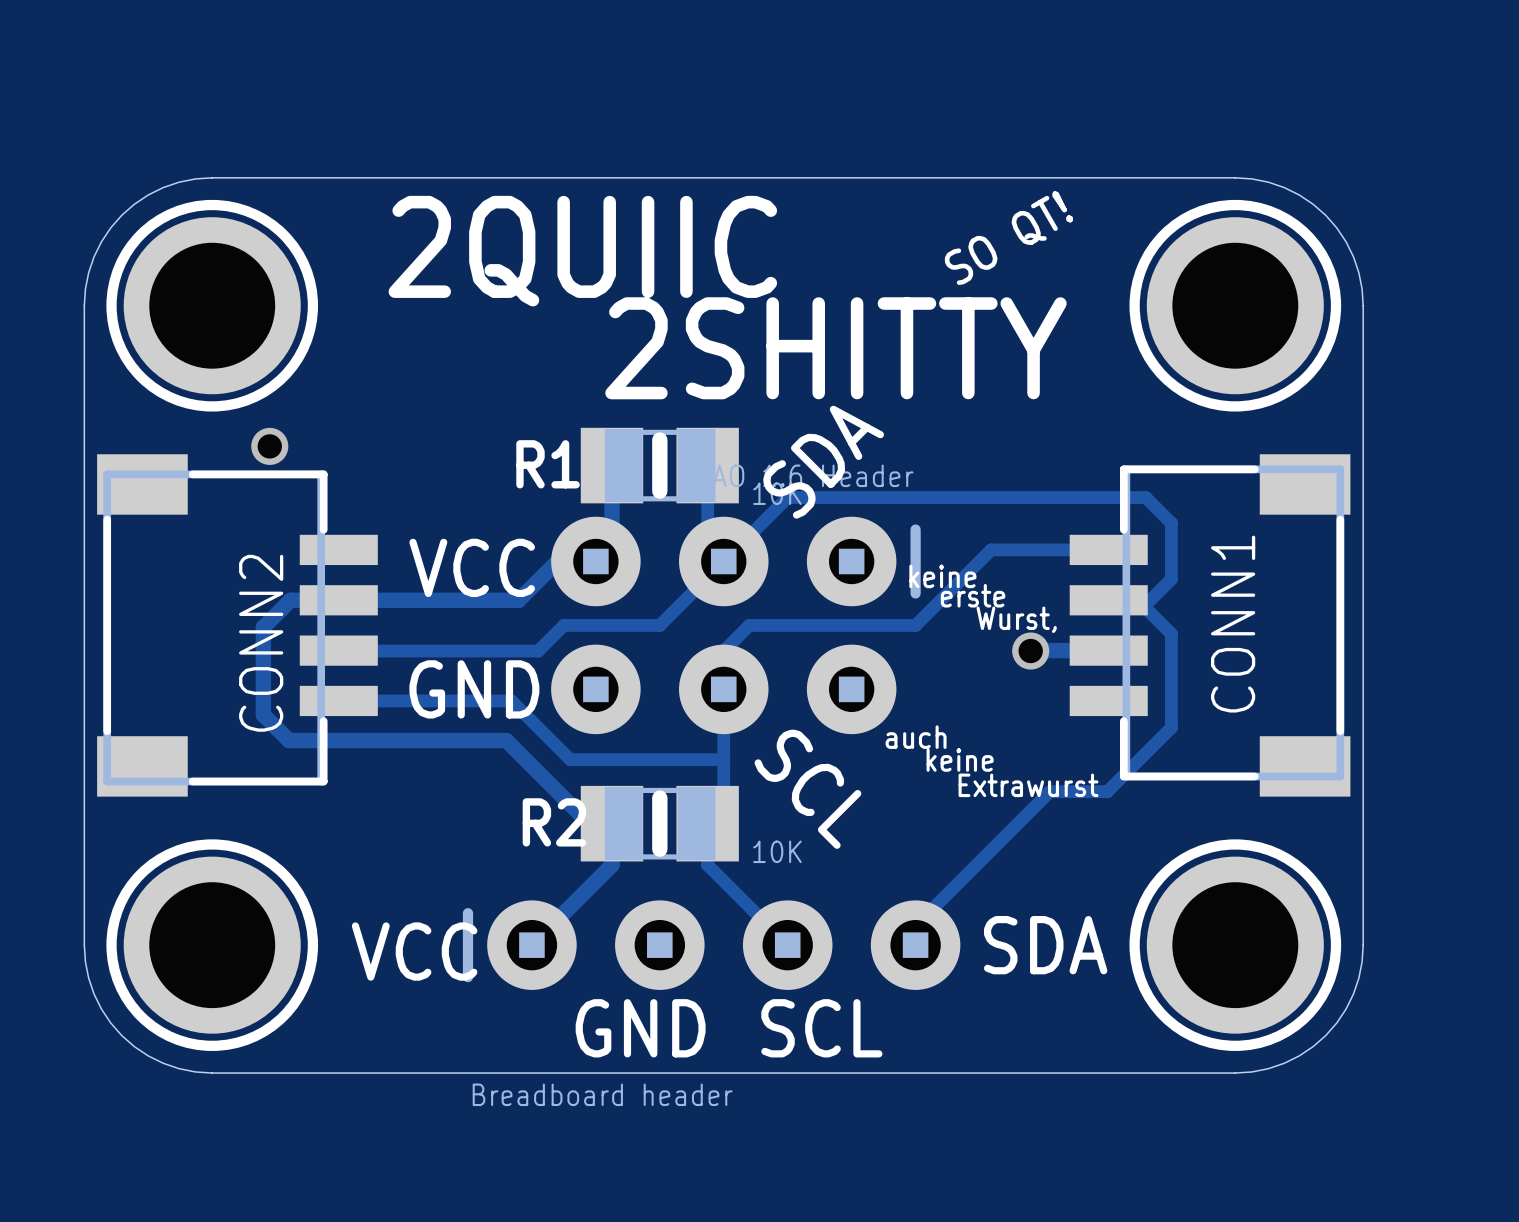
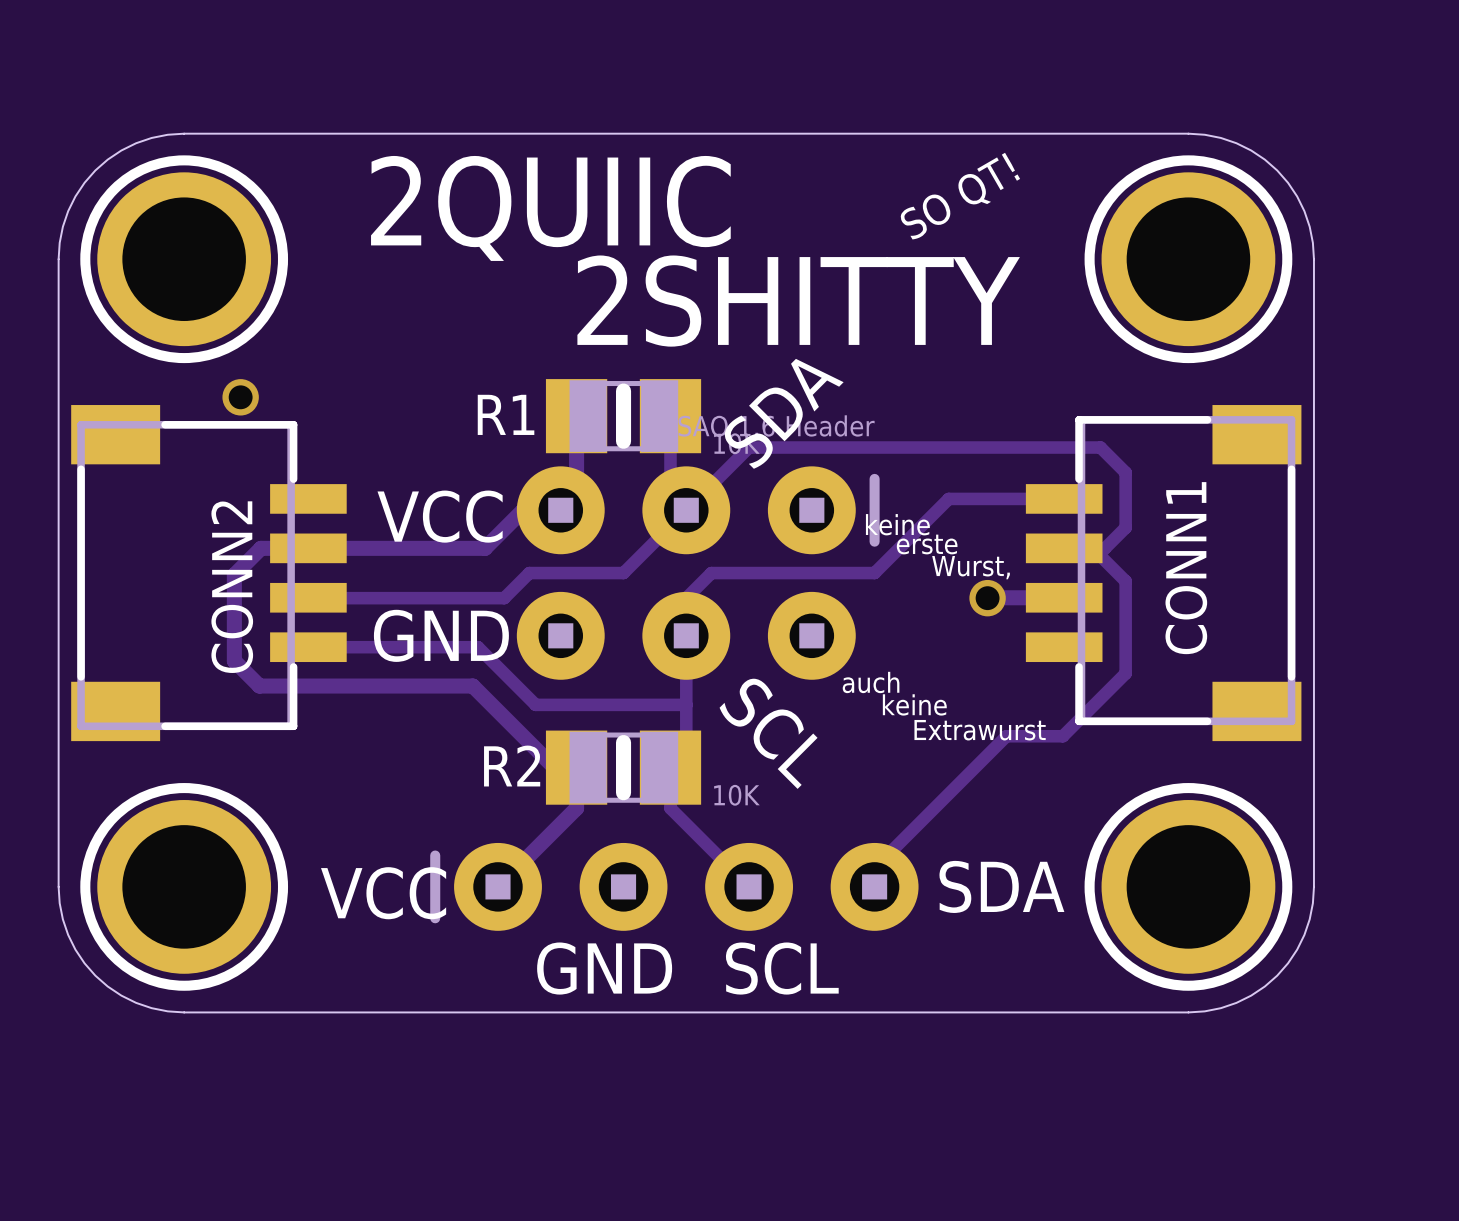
part value: Breadboard header (602, 1094) -> none

